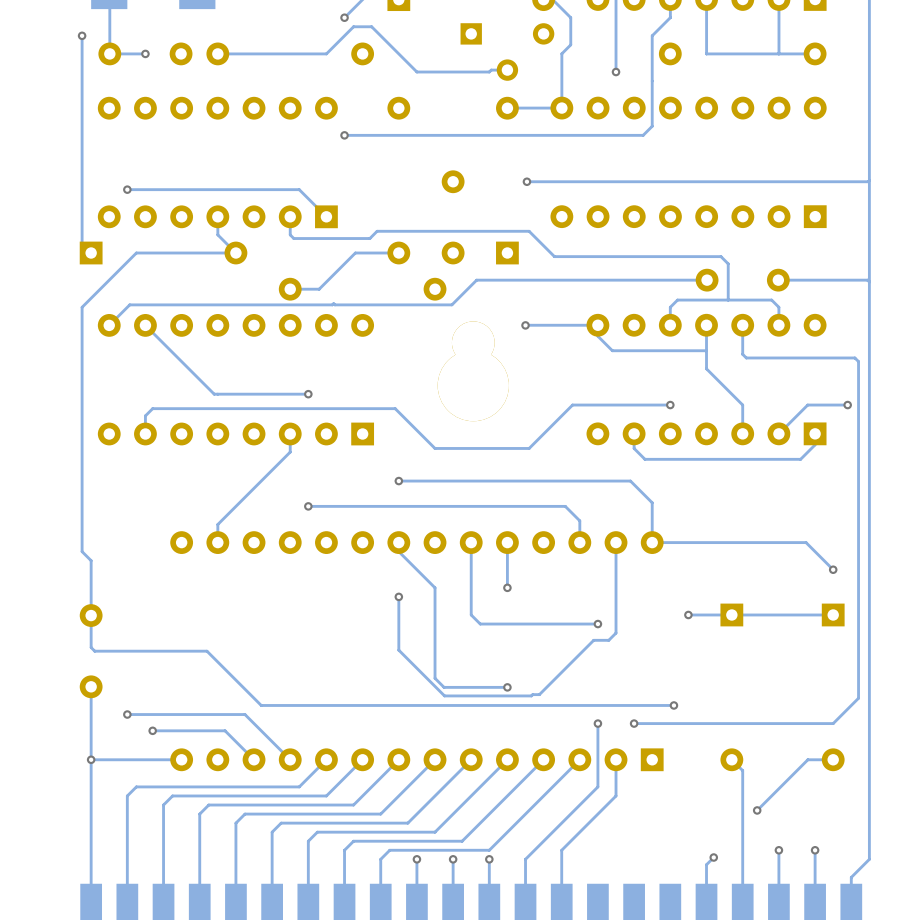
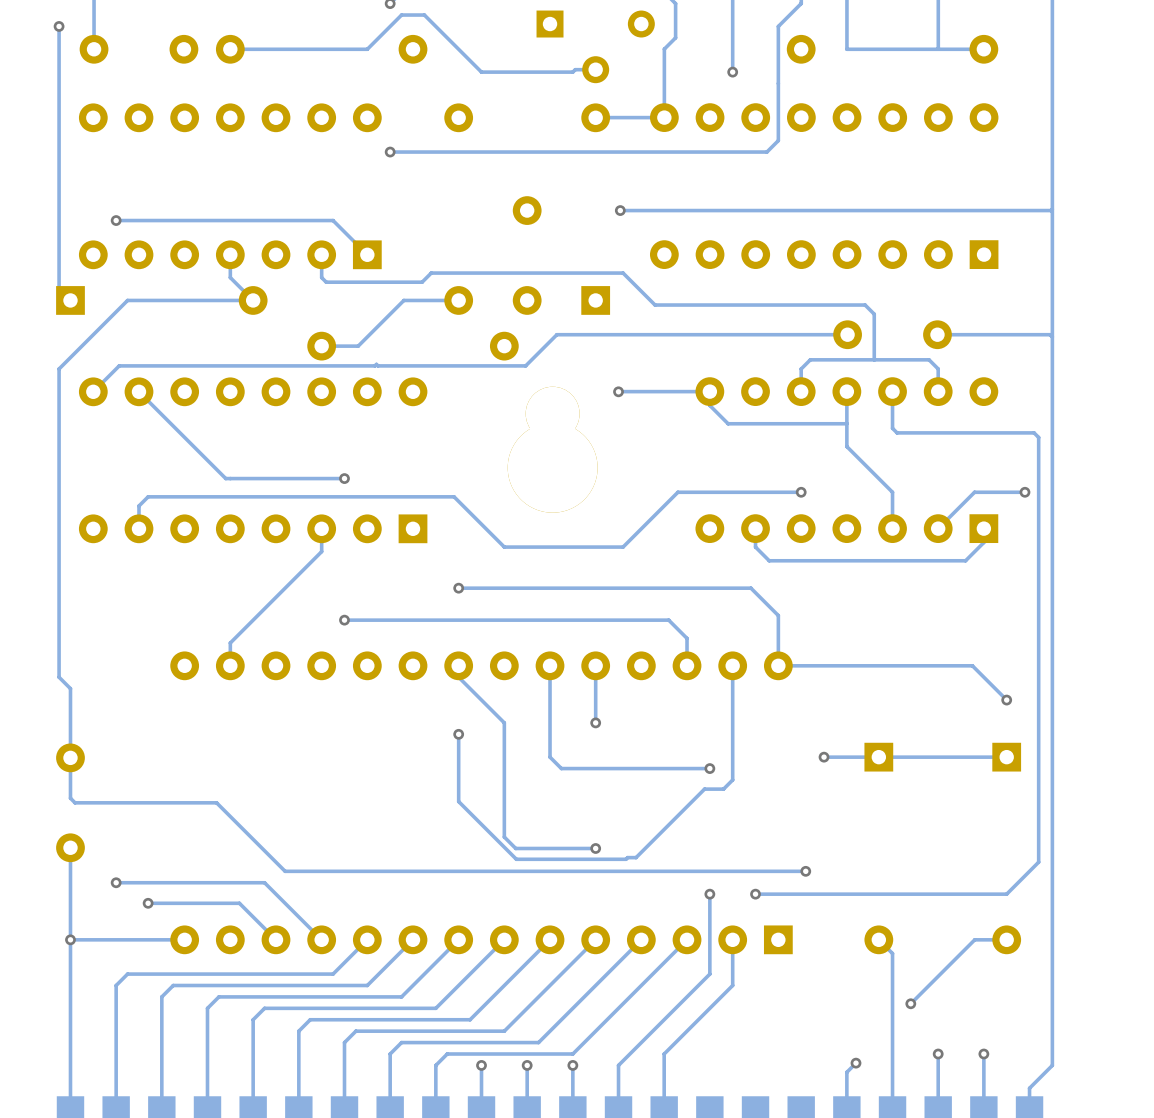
track: (145, 53) (109, 53) -> none
via: (145, 53) -> none

